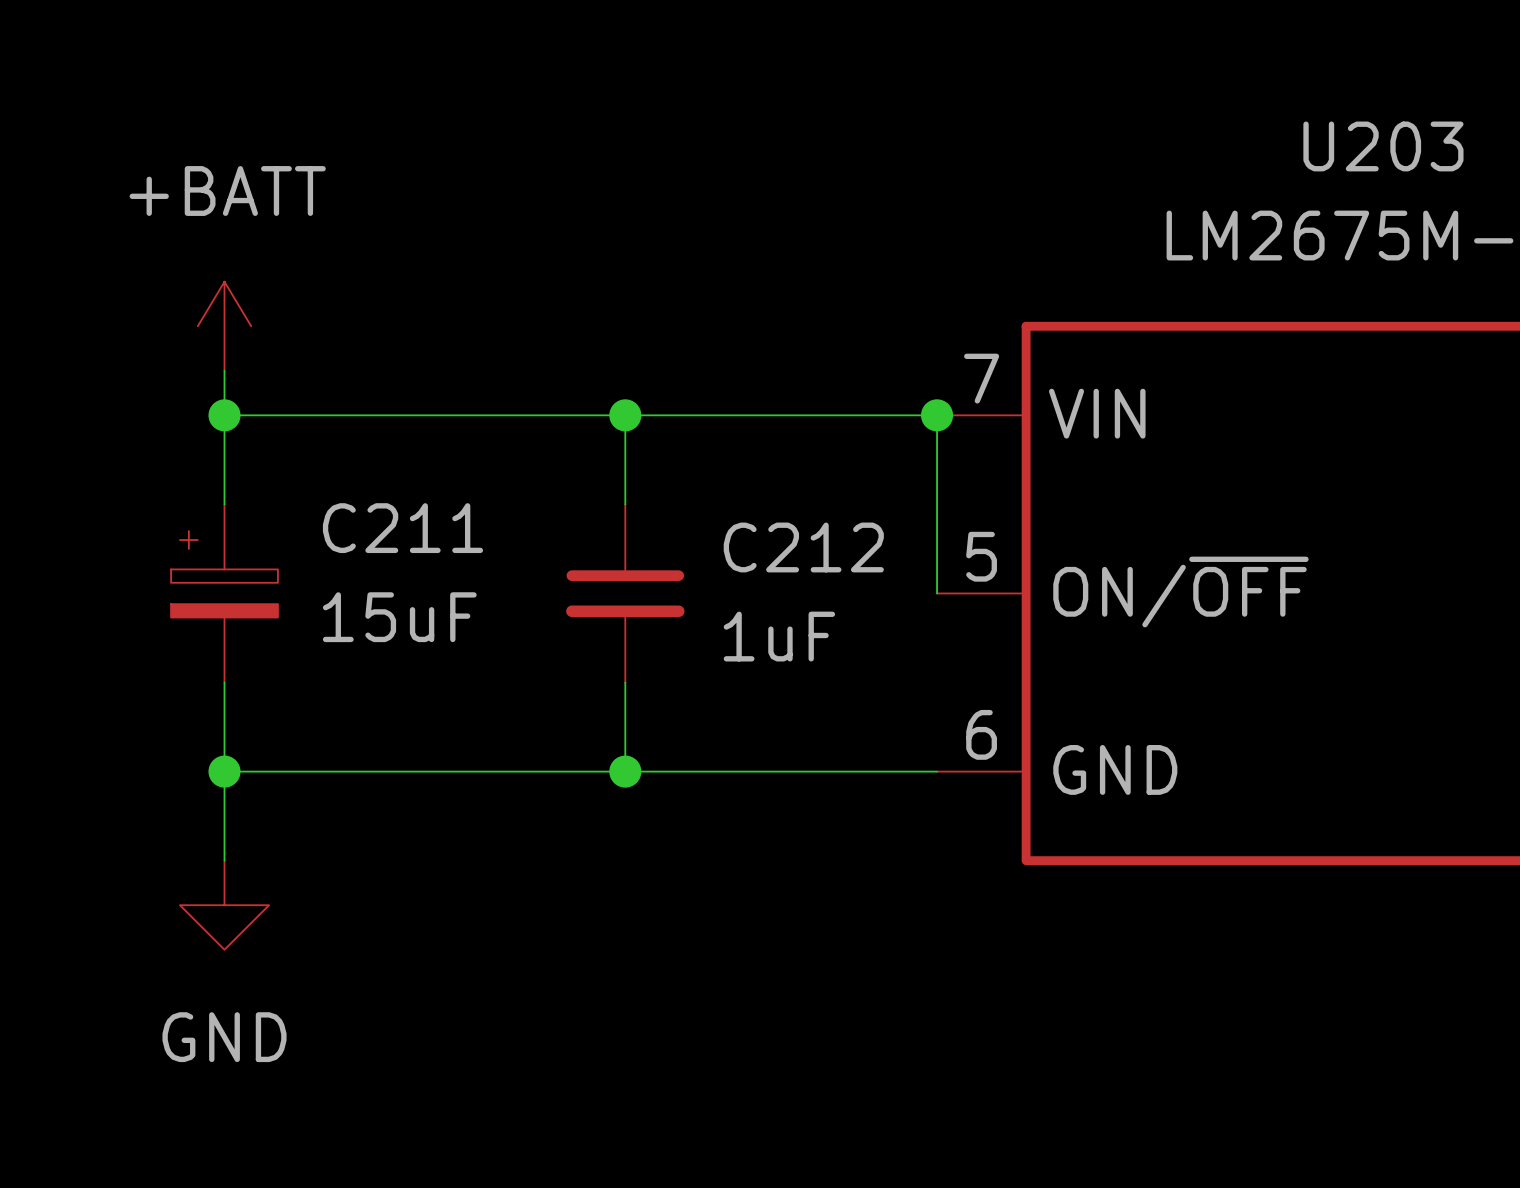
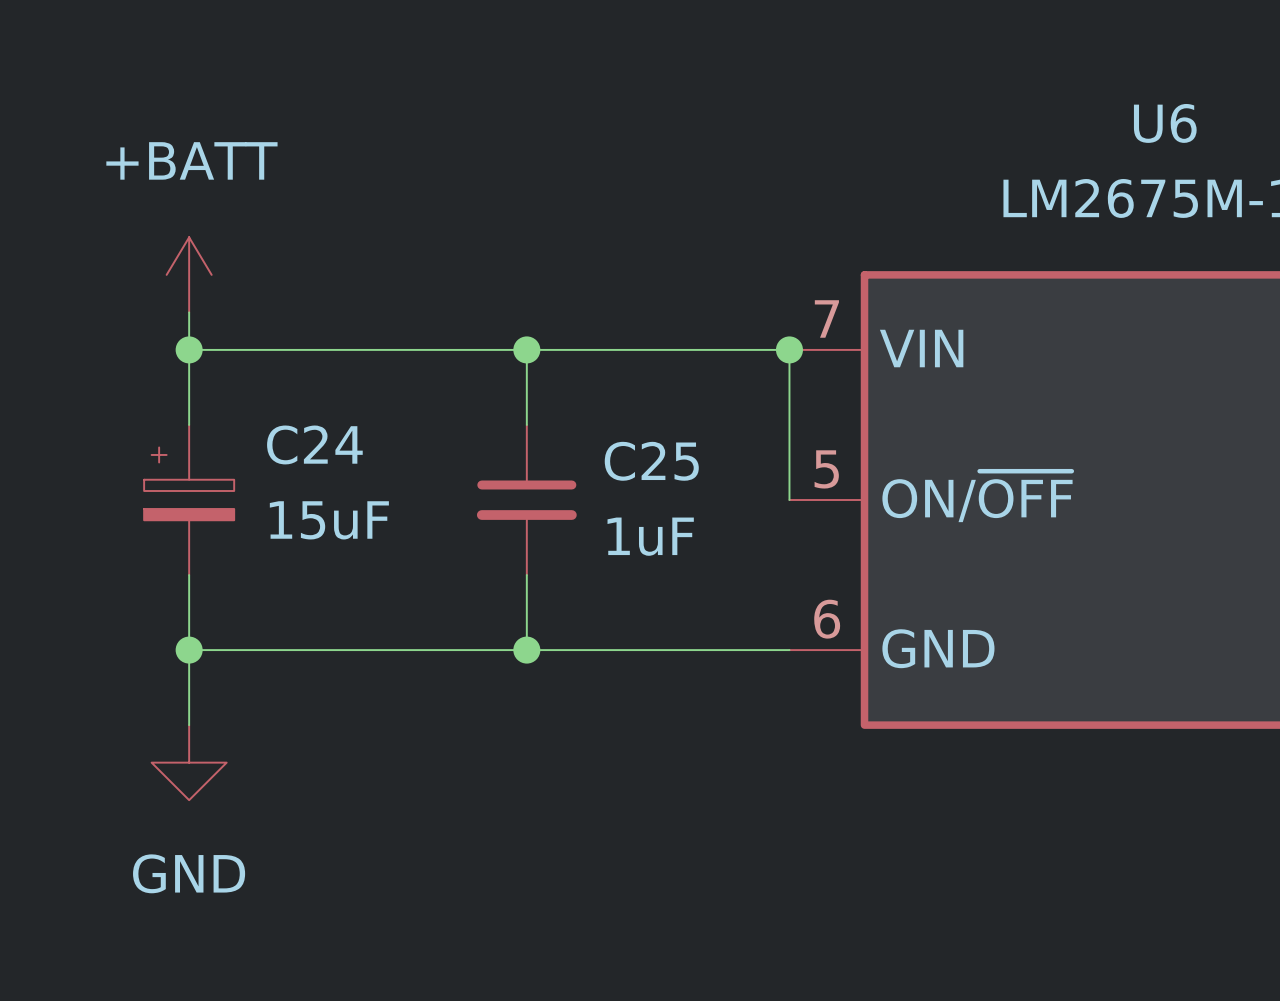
U203 name: U203 (1383, 146) -> U6 (1165, 123)
C211 name: C211 (402, 528) -> C24 (314, 444)
C212 name: C212 (803, 547) -> C25 (651, 461)

